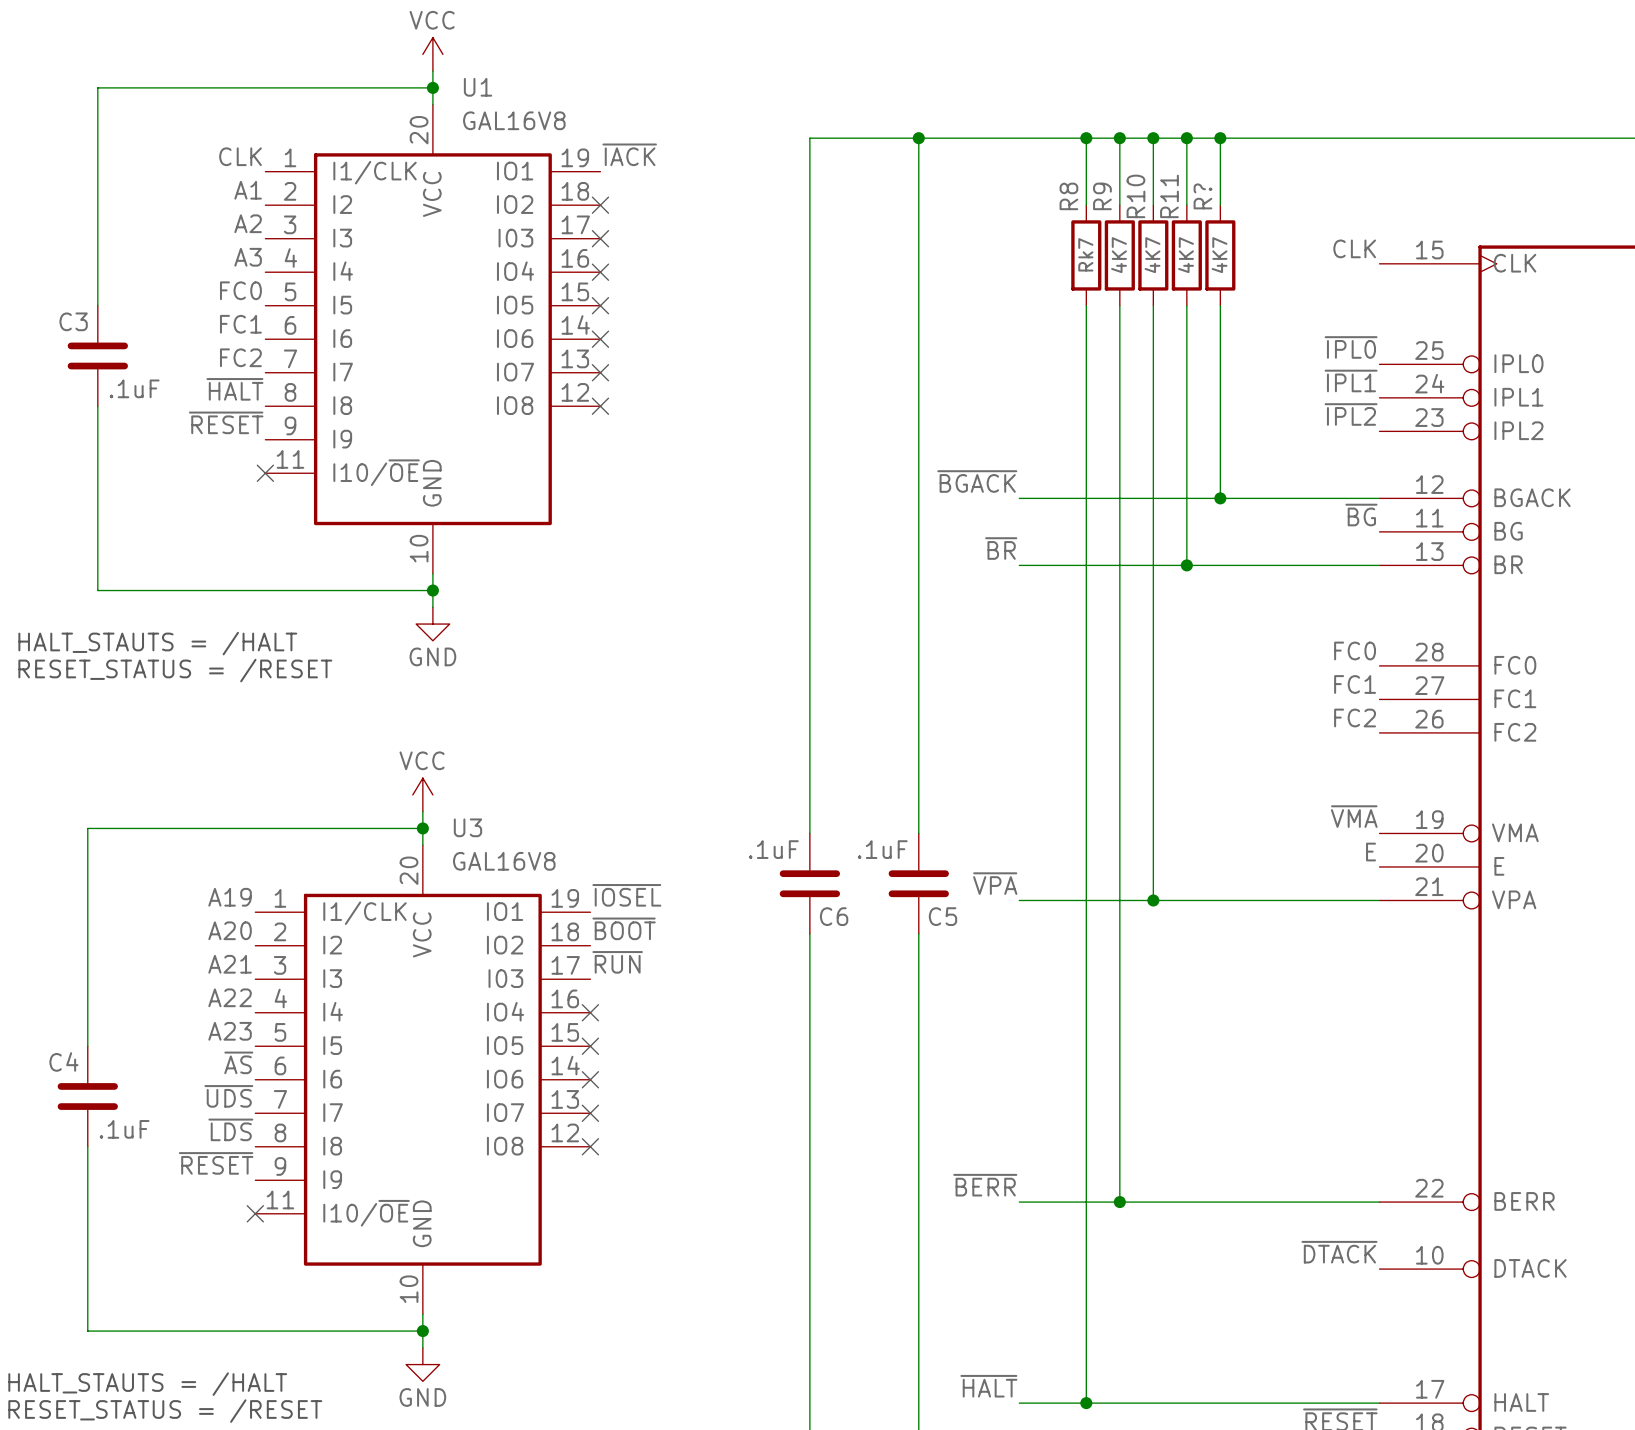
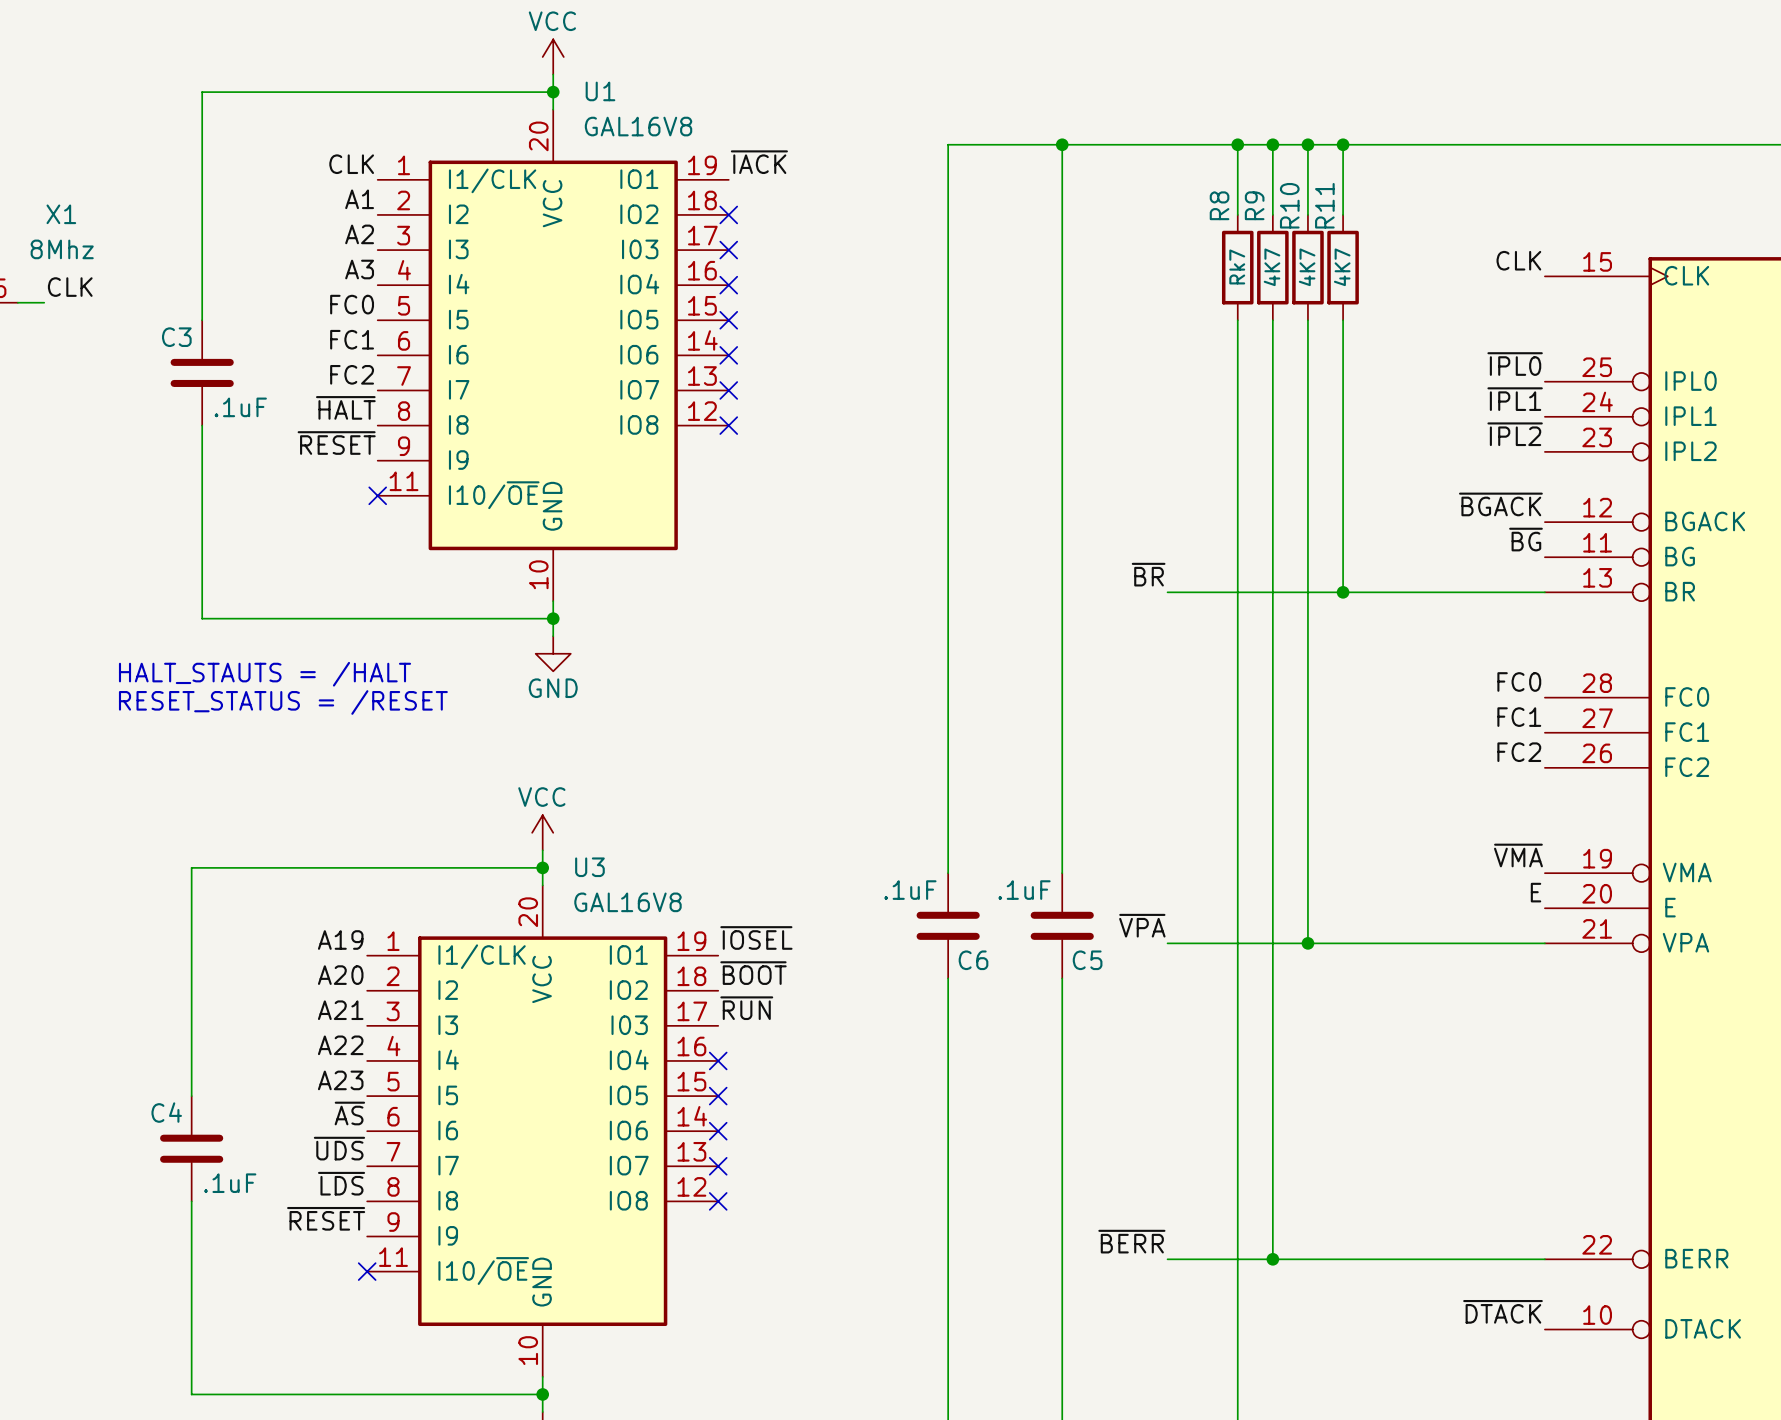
wire: (1220, 138) (1220, 205) -> none
junction: (1220, 138) -> none
R?: 4K7 (1220, 255) -> none
wire: (1220, 305) (1220, 498) -> none
label: ~{BGACK} (977, 481) -> none
label: none -> ~{BGACK} (1500, 504)
wire: (1019, 498) (1379, 498) -> none
junction: (1220, 498) -> none

